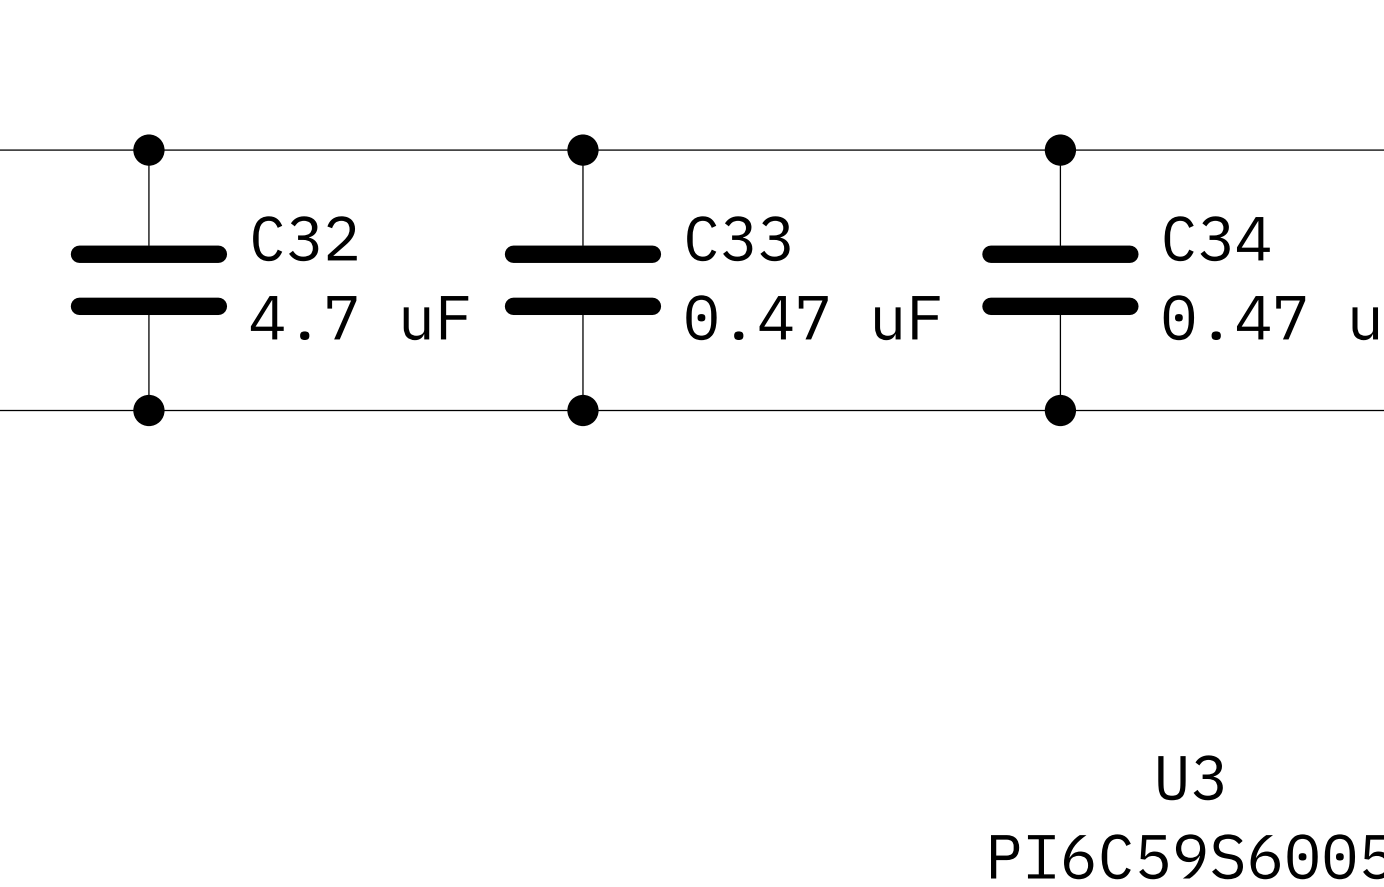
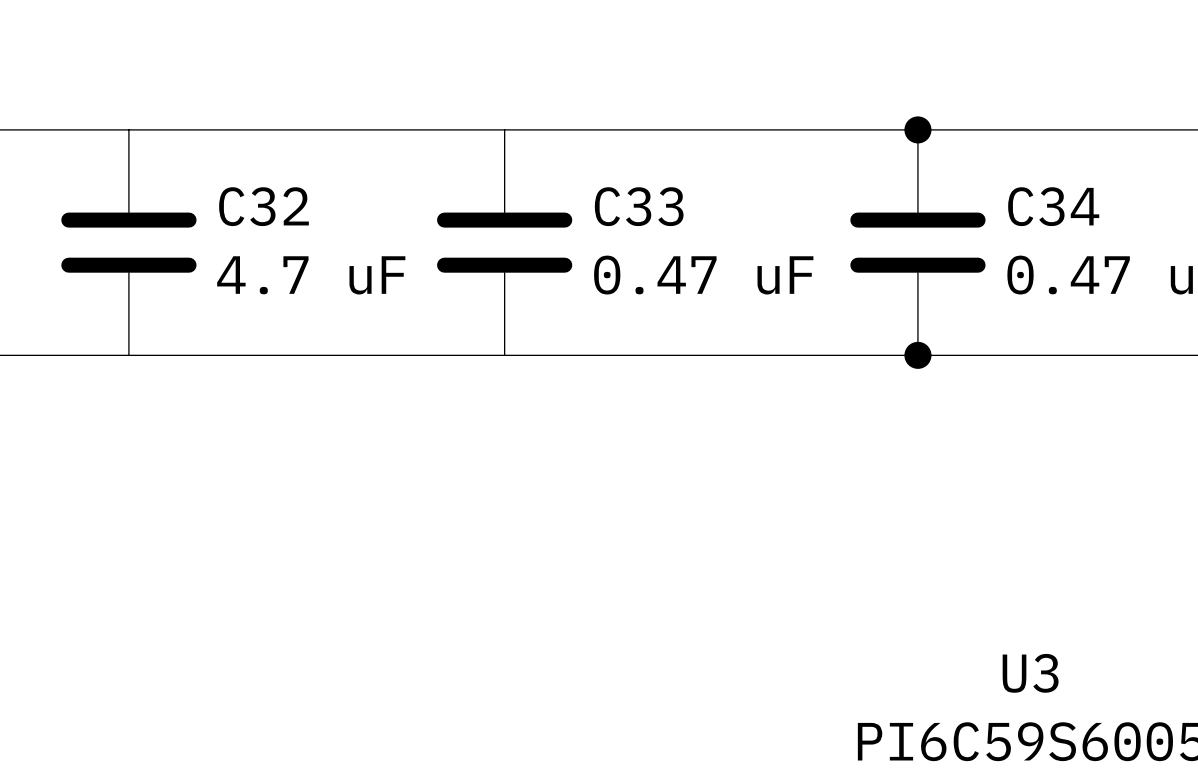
junction: (148, 150) -> none
junction: (582, 150) -> none
junction: (148, 410) -> none
junction: (582, 410) -> none

